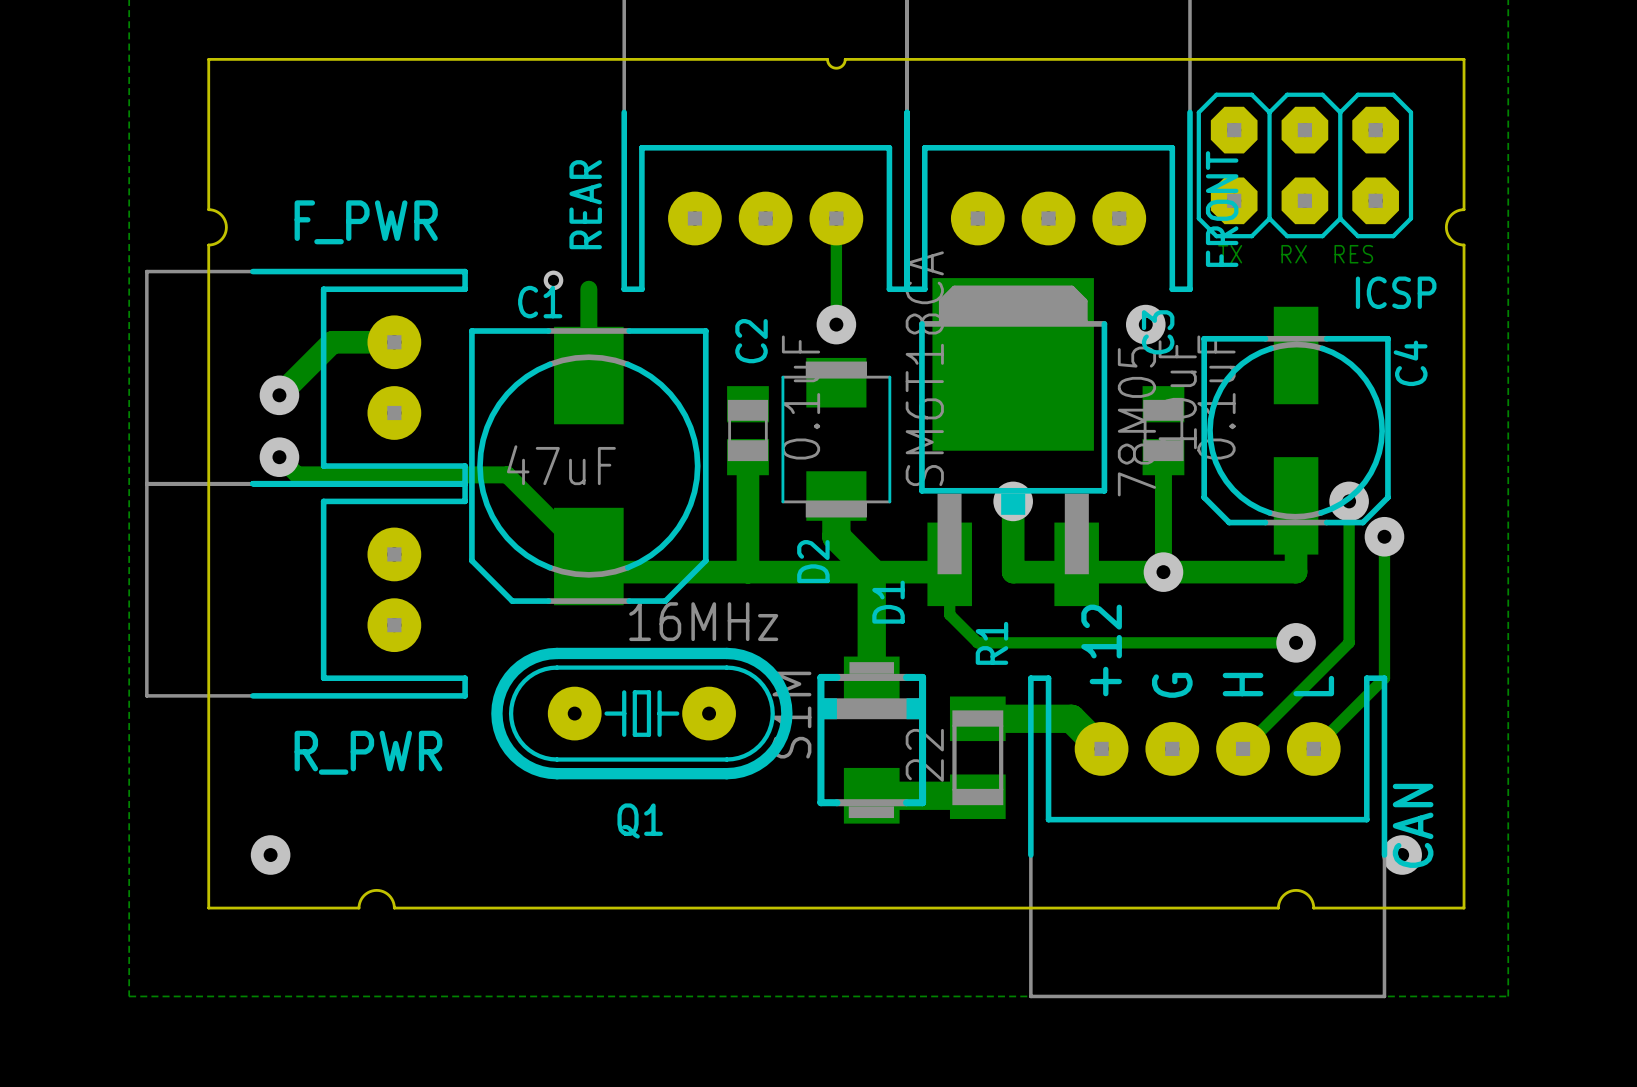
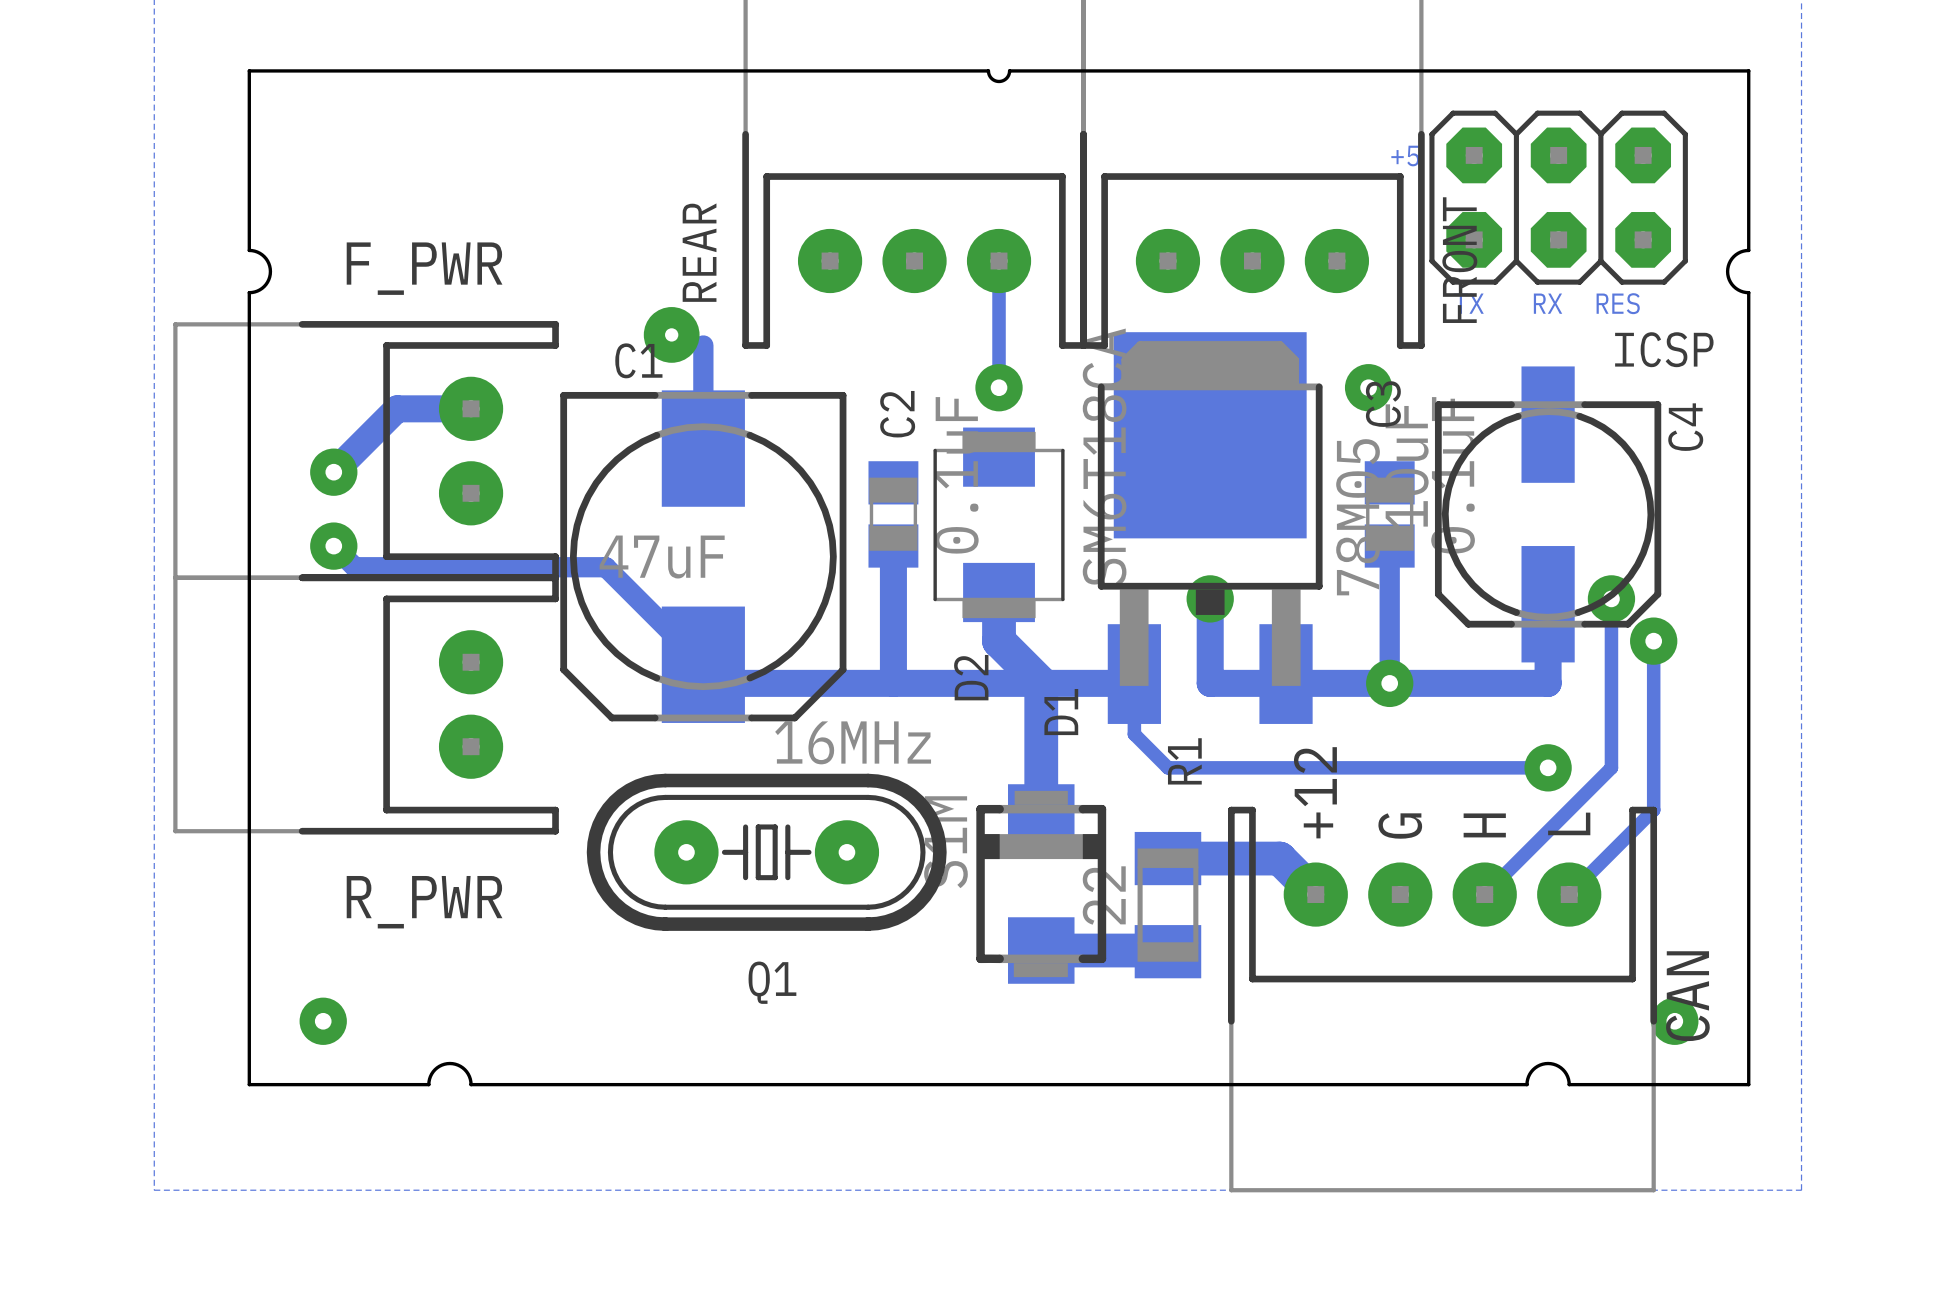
text: none -> +5 (1405, 156)
via size: [543, 270, 564, 291] -> [643, 307, 700, 363]

